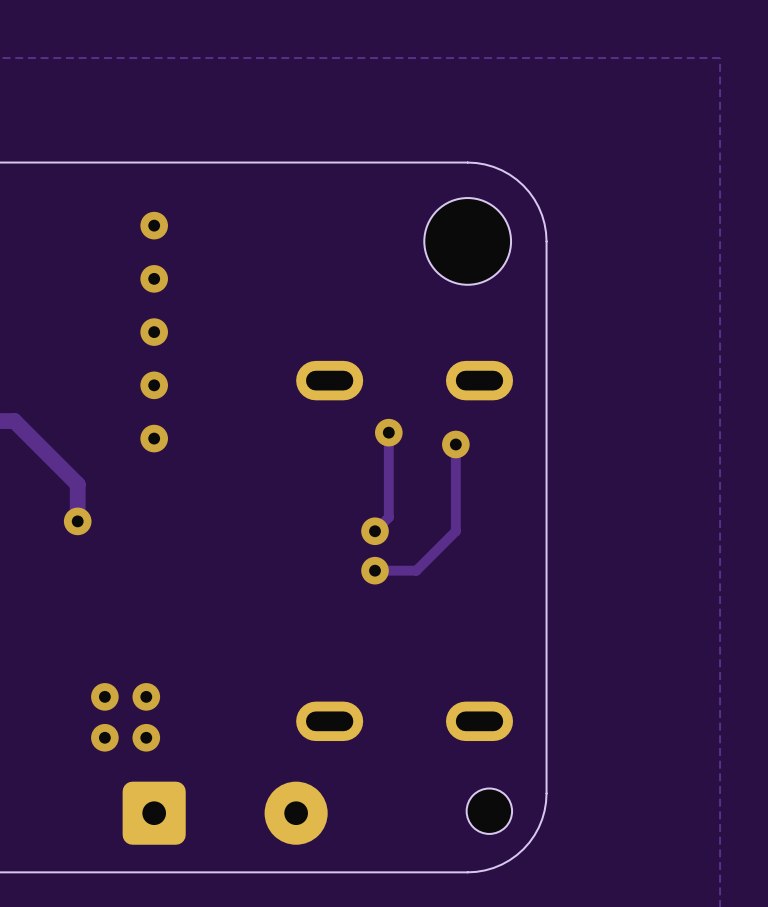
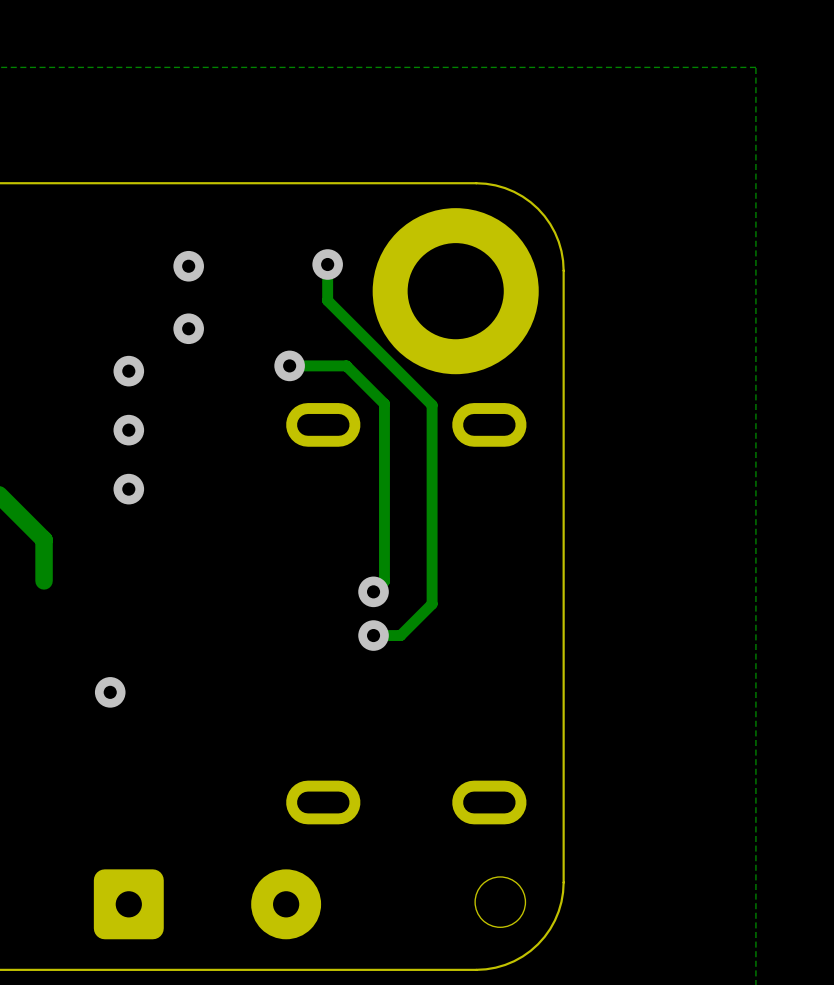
part footprint: [424, 198, 512, 285] -> [372, 208, 539, 375]
via: (154, 225) -> none
via: none -> (327, 264)
via: none -> (188, 266)
via: (154, 278) -> none
via: none -> (188, 328)
via: none -> (289, 365)
track: (388, 432) (388, 517) (384, 521) -> (289, 365) (346, 365) (384, 403) (384, 581)
via: (388, 432) -> none
track: (455, 444) (455, 531) (416, 570) (399, 570) -> (327, 264) (327, 300) (432, 405) (432, 604) (400, 635)
via: (455, 444) -> none
via: (77, 521) -> none
via: none -> (110, 692)
via: (104, 696) -> none
via: (146, 696) -> none
via: (104, 737) -> none
via: (146, 737) -> none

